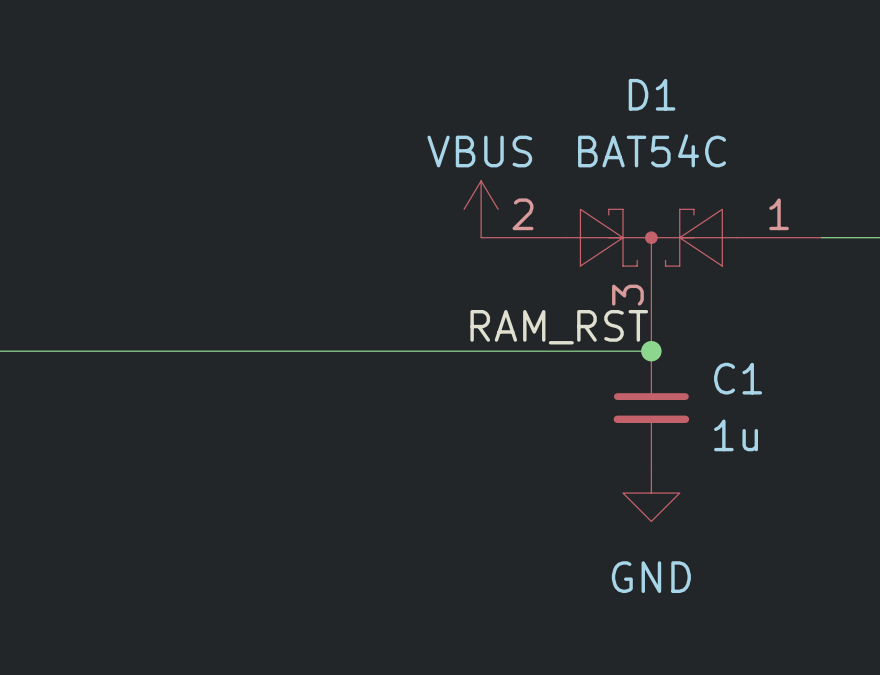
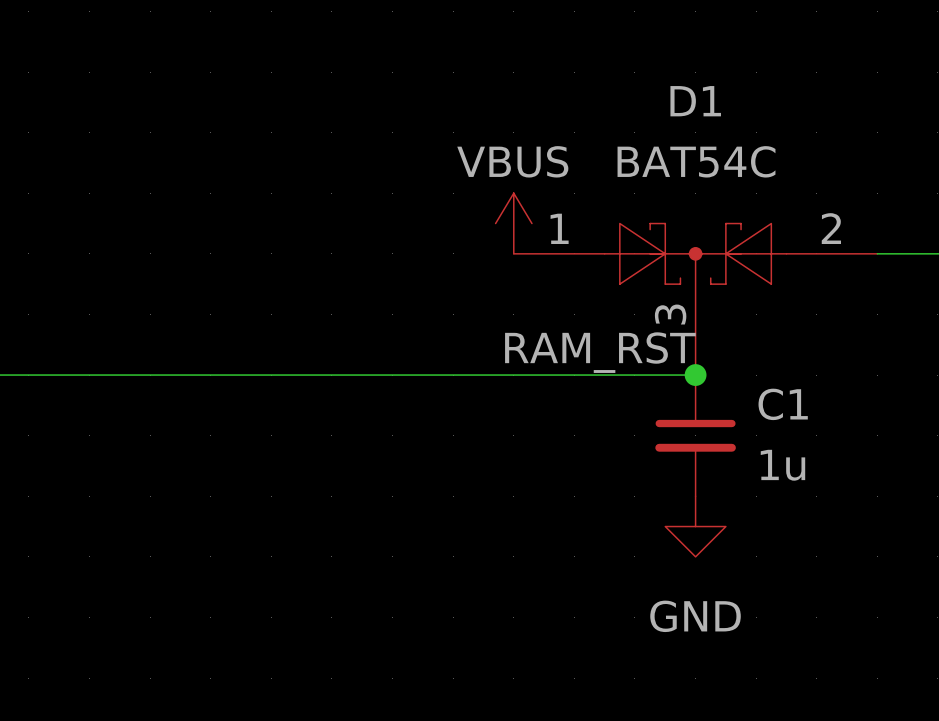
D1 flip: as is (651, 237) -> left-right (695, 253)

